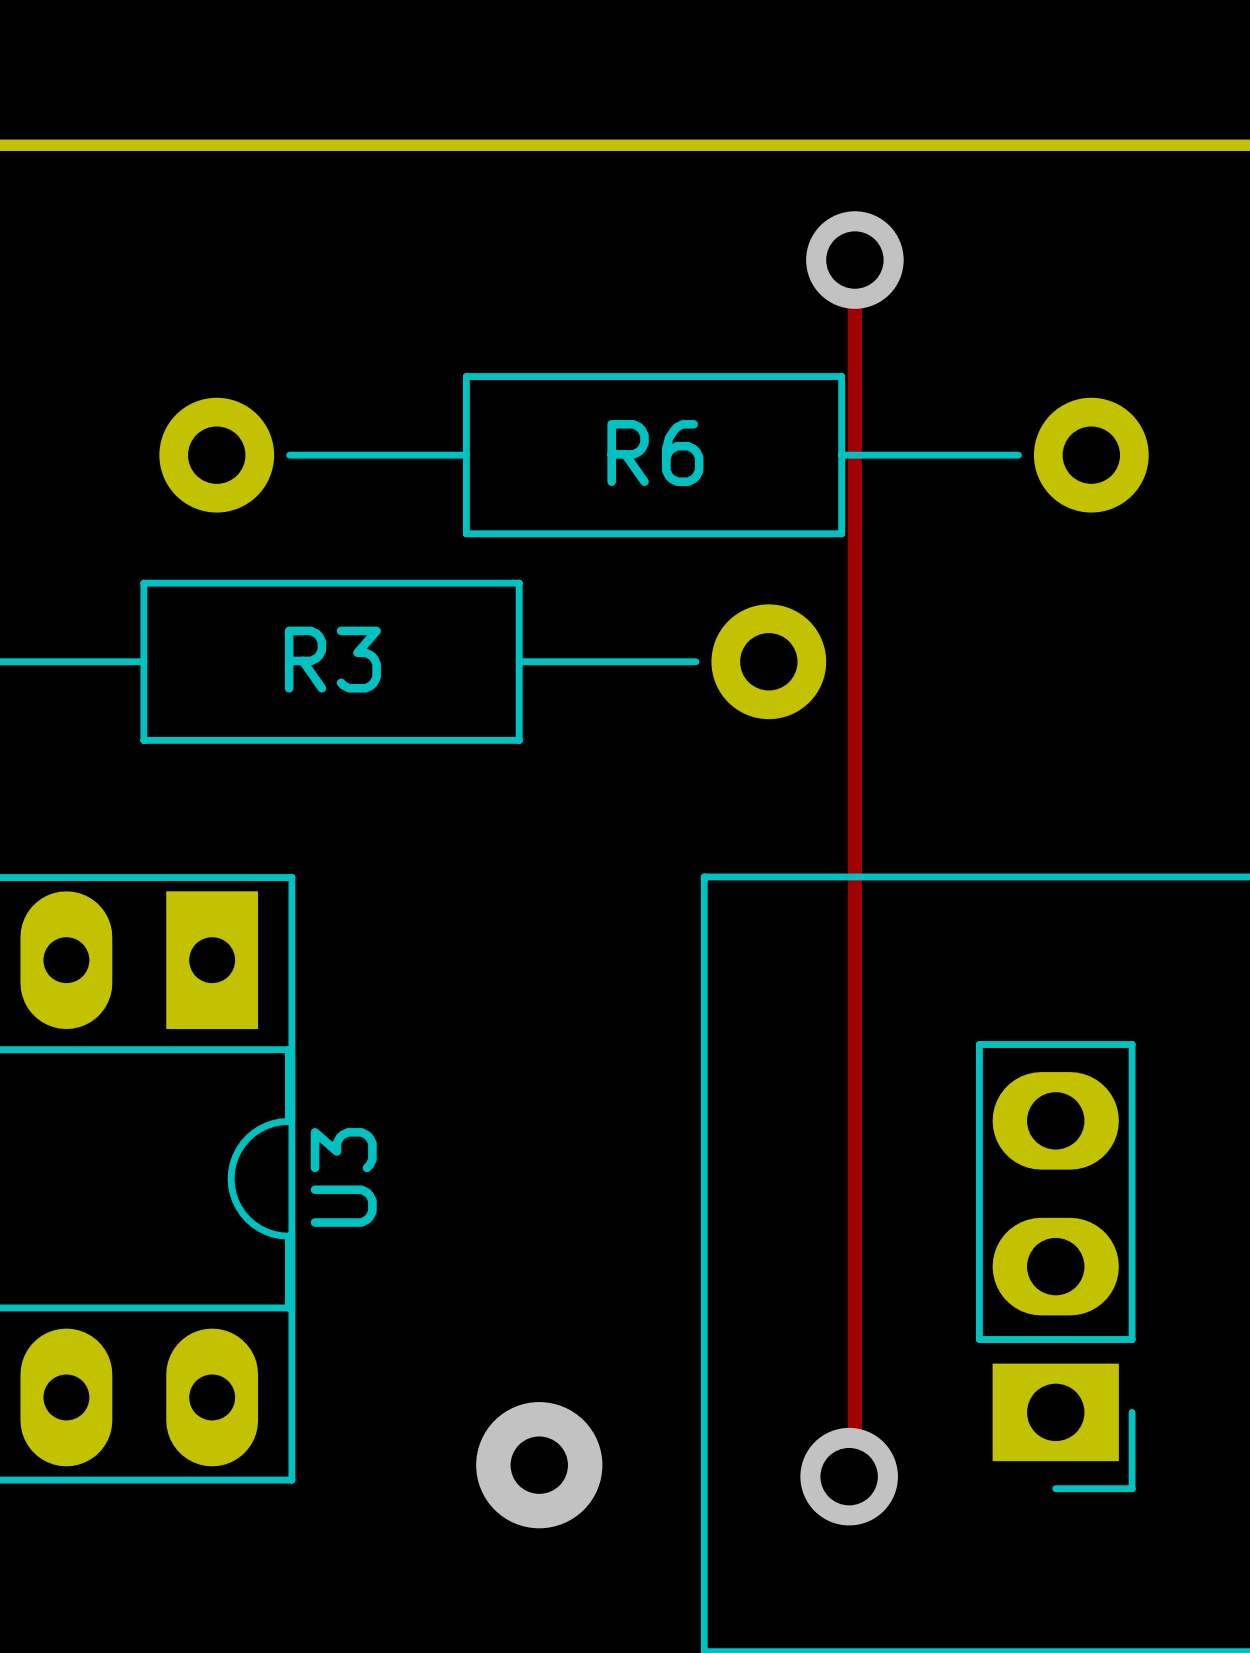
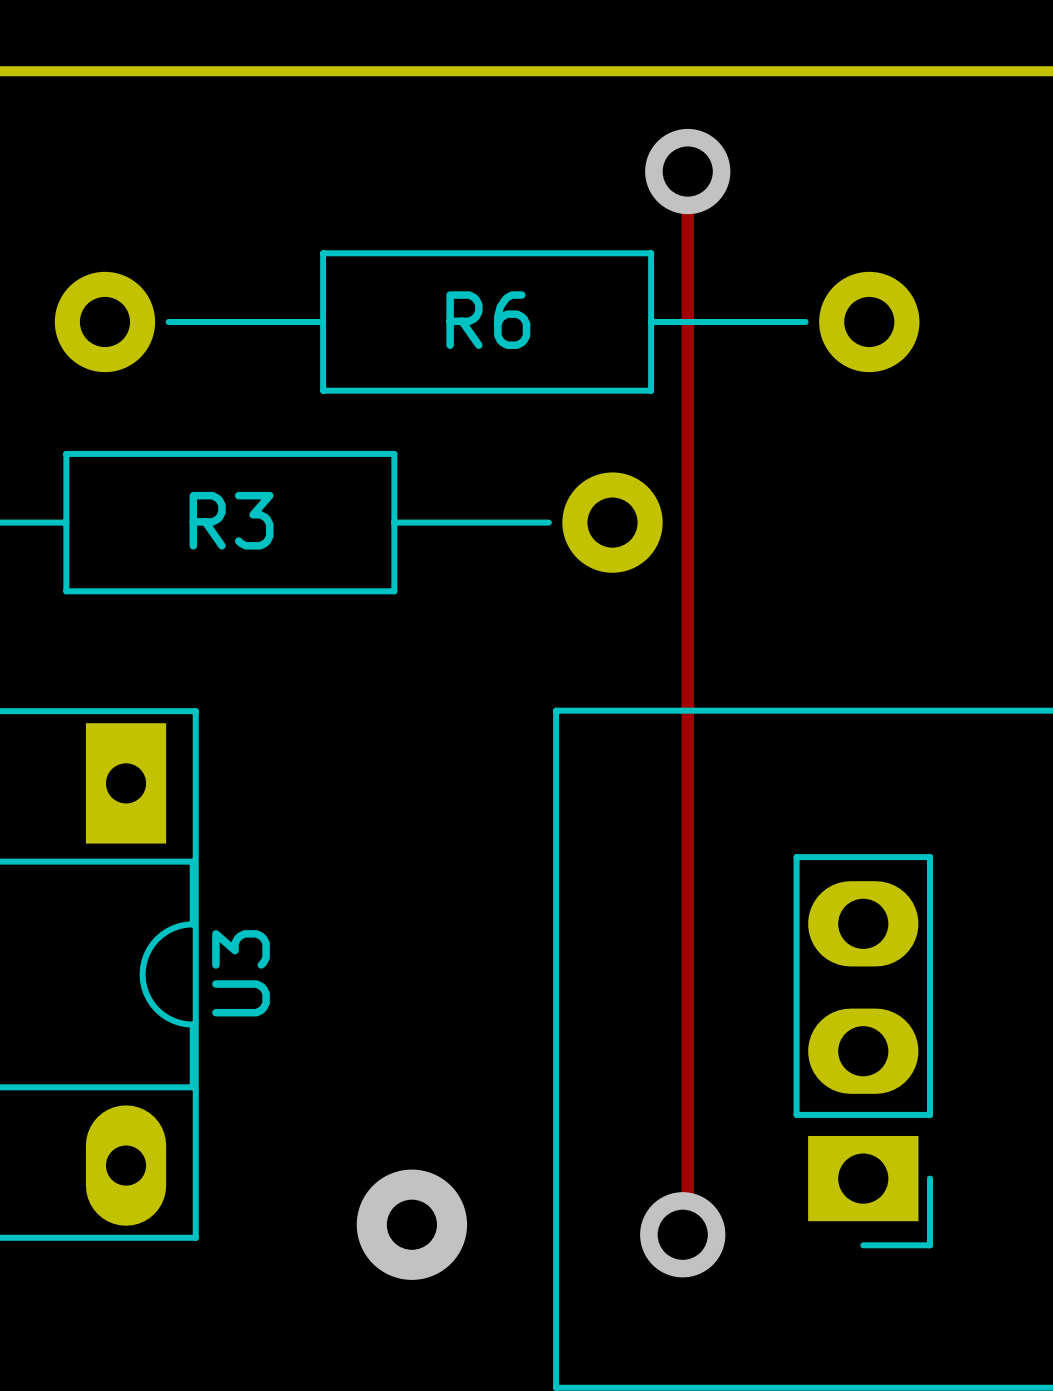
R6 position: (654, 455) -> (487, 321)

